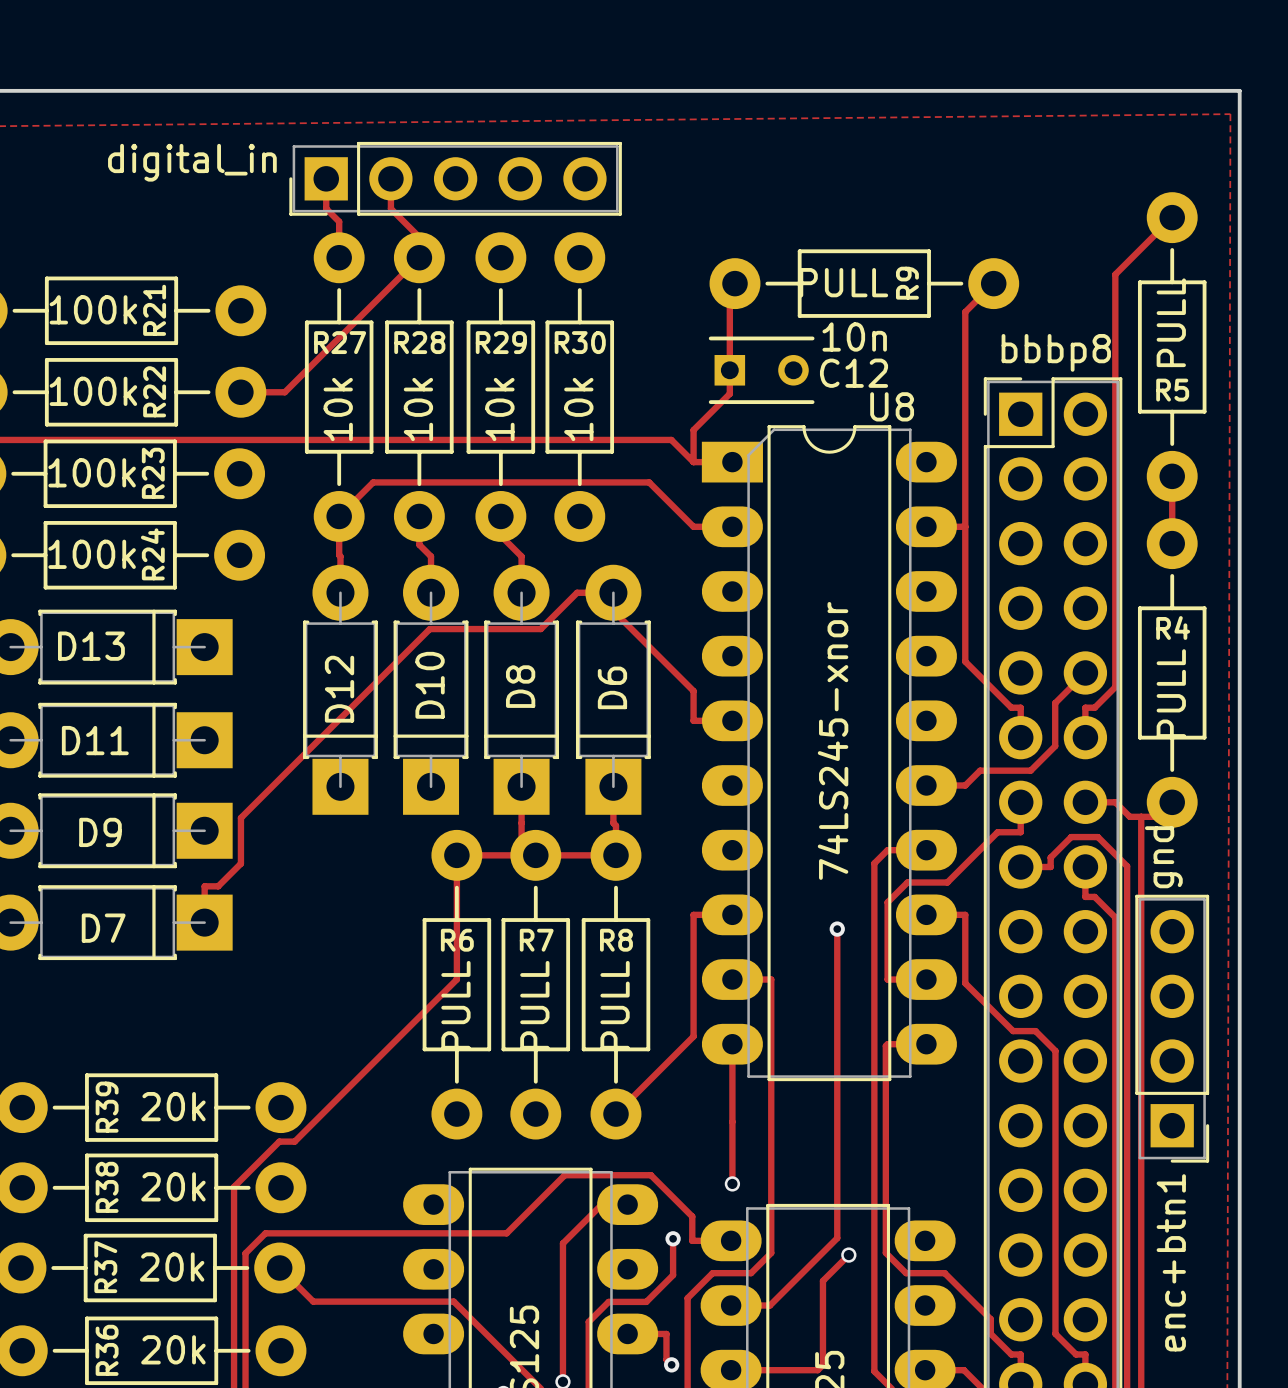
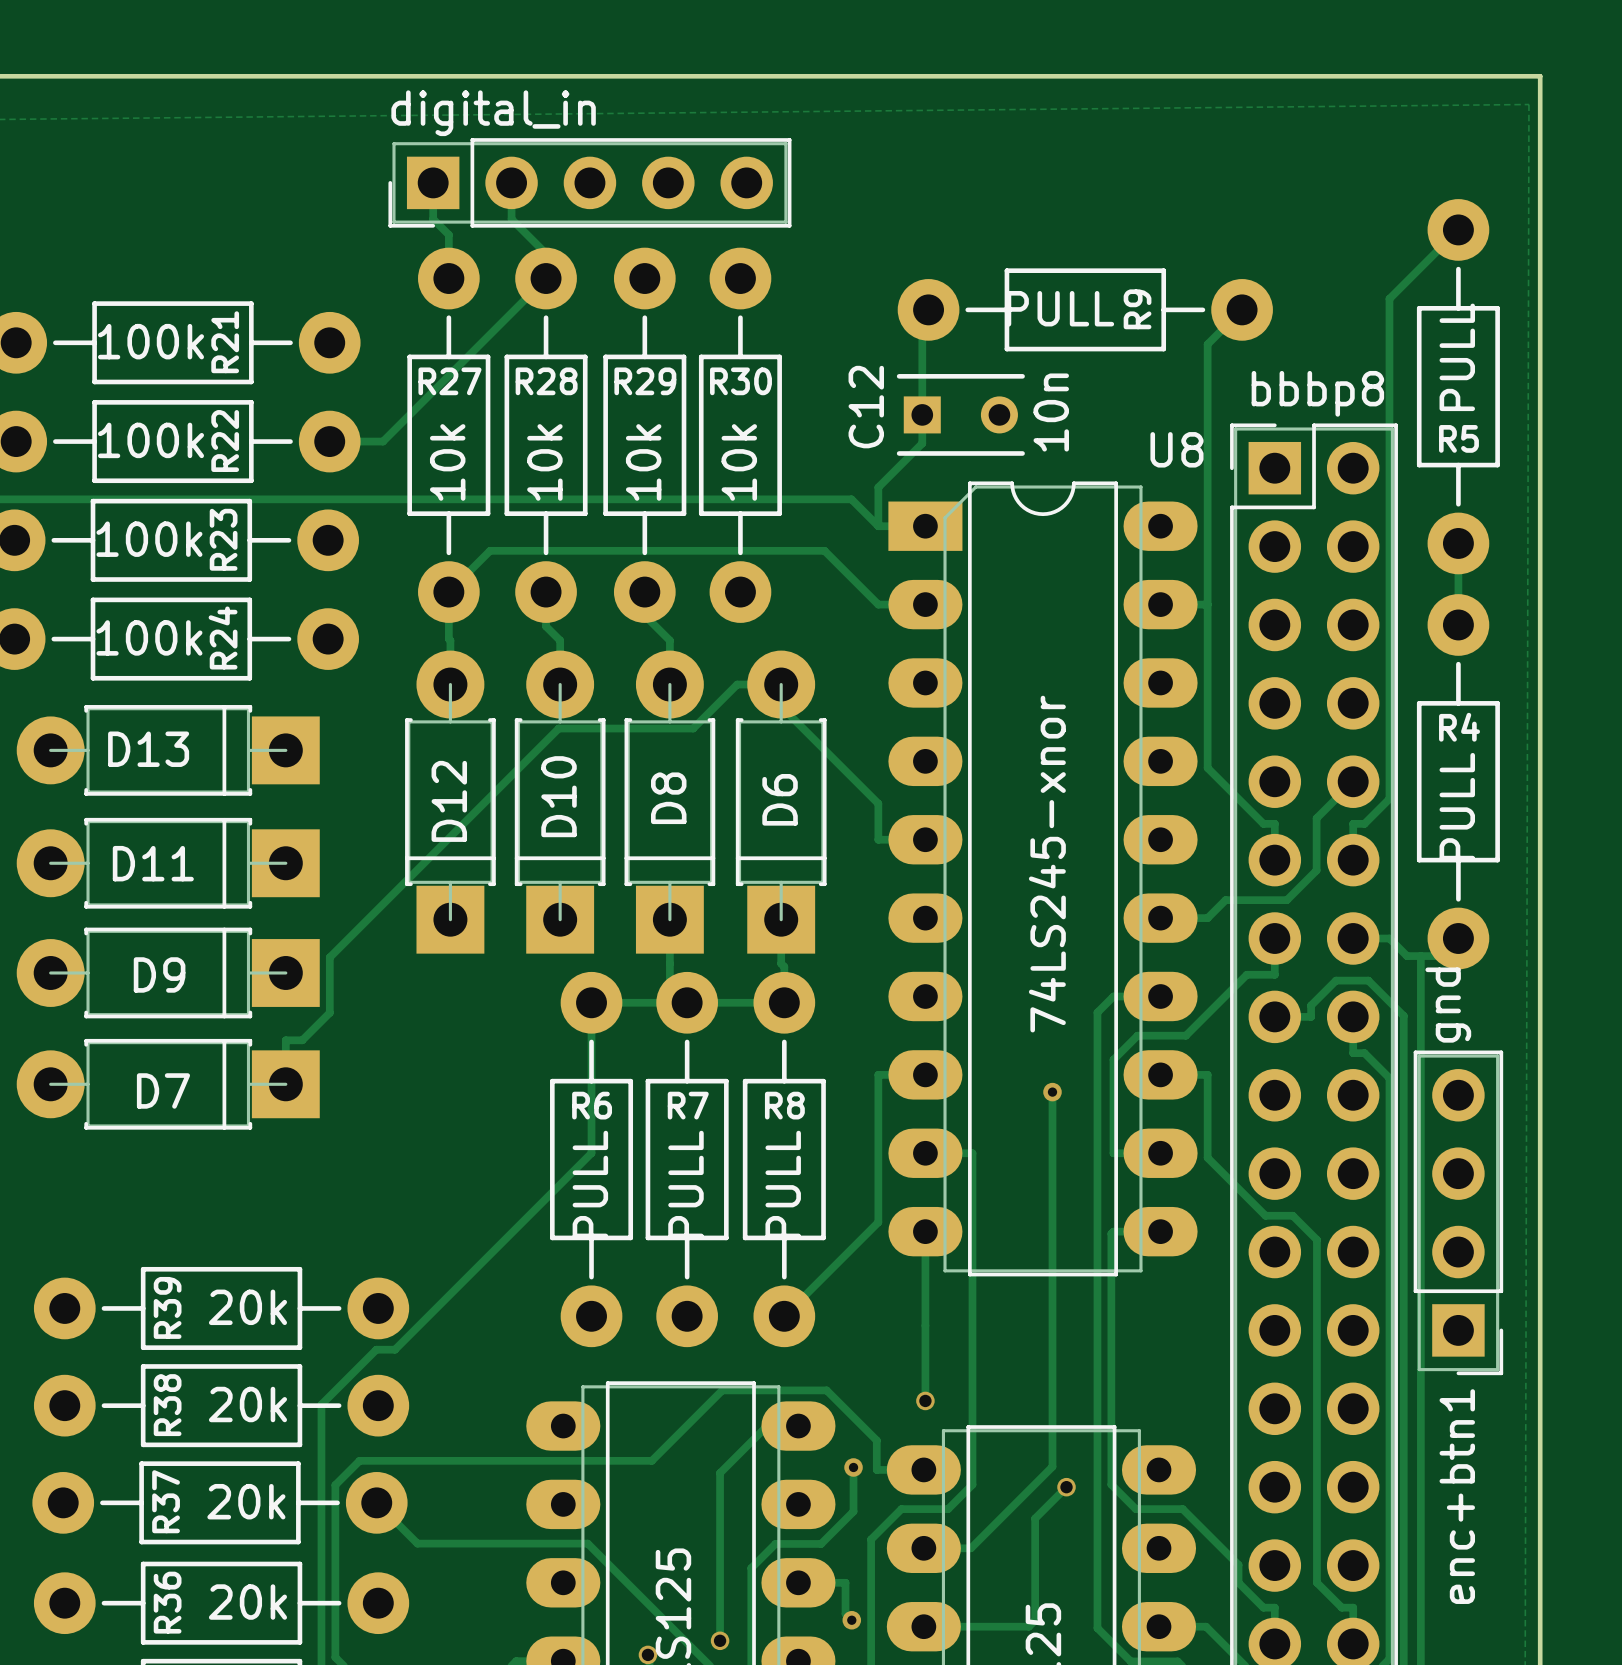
part value position: digital_in (192, 162) -> digital_in (493, 113)
C12 value rotation: 0° (854, 336) -> 90° counterclockwise (1051, 412)
C12 name rotation: 0° (854, 373) -> 90° counterclockwise (866, 407)
C12 name position: C12 (854, 373) -> C12 (866, 407)
U8 name position: U8 (892, 406) -> U8 (1176, 449)

